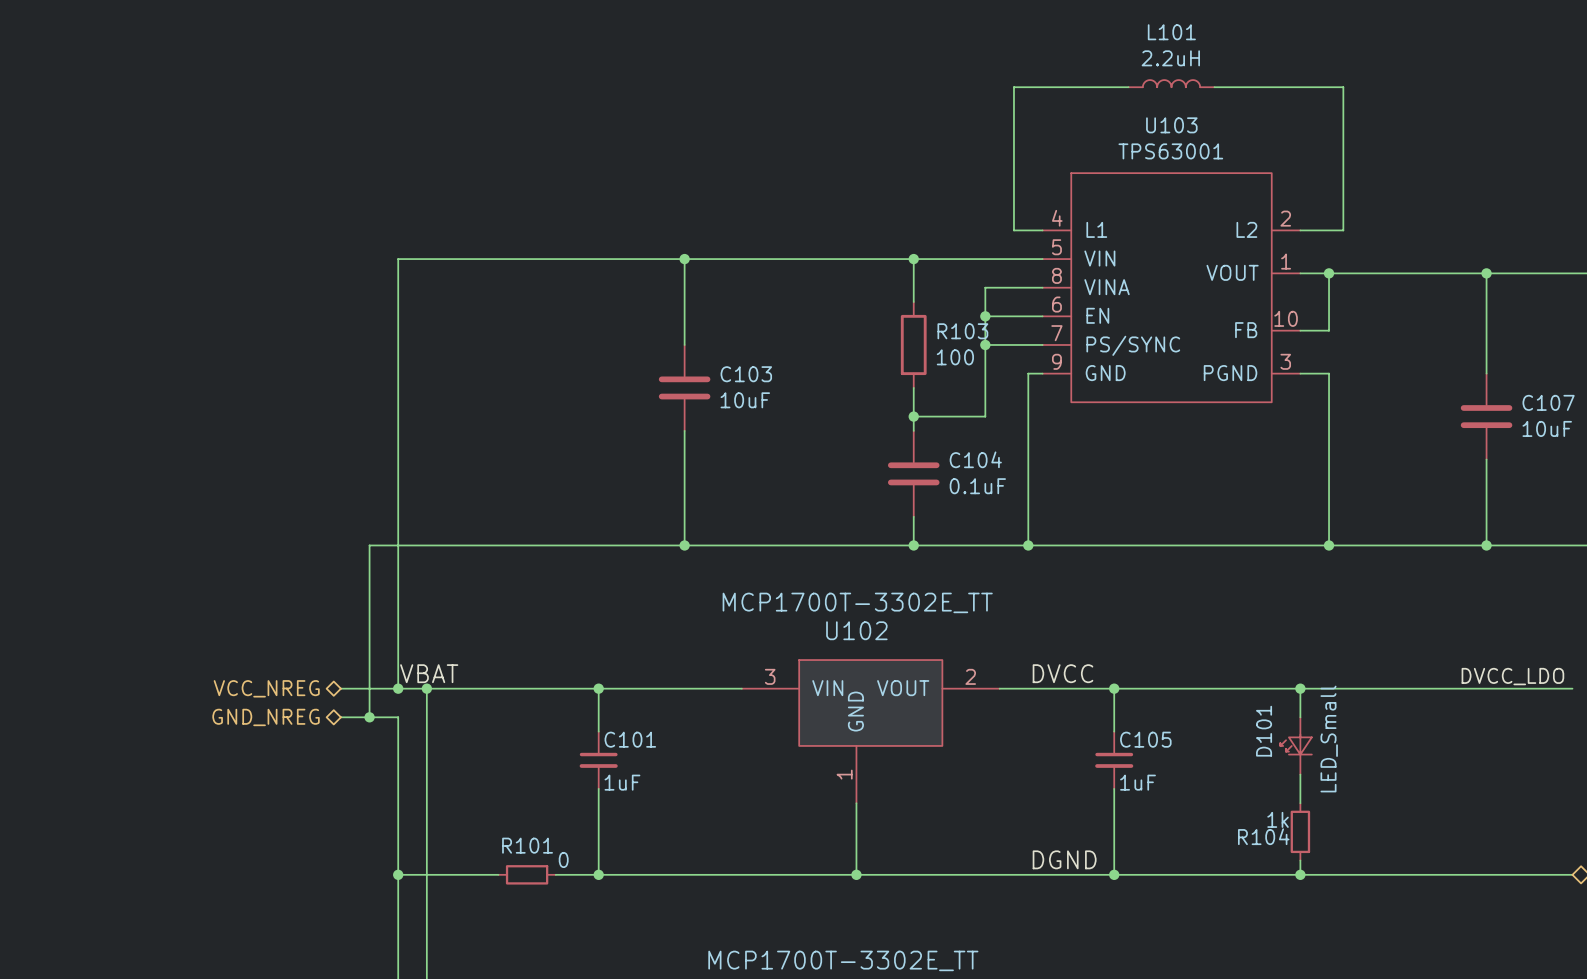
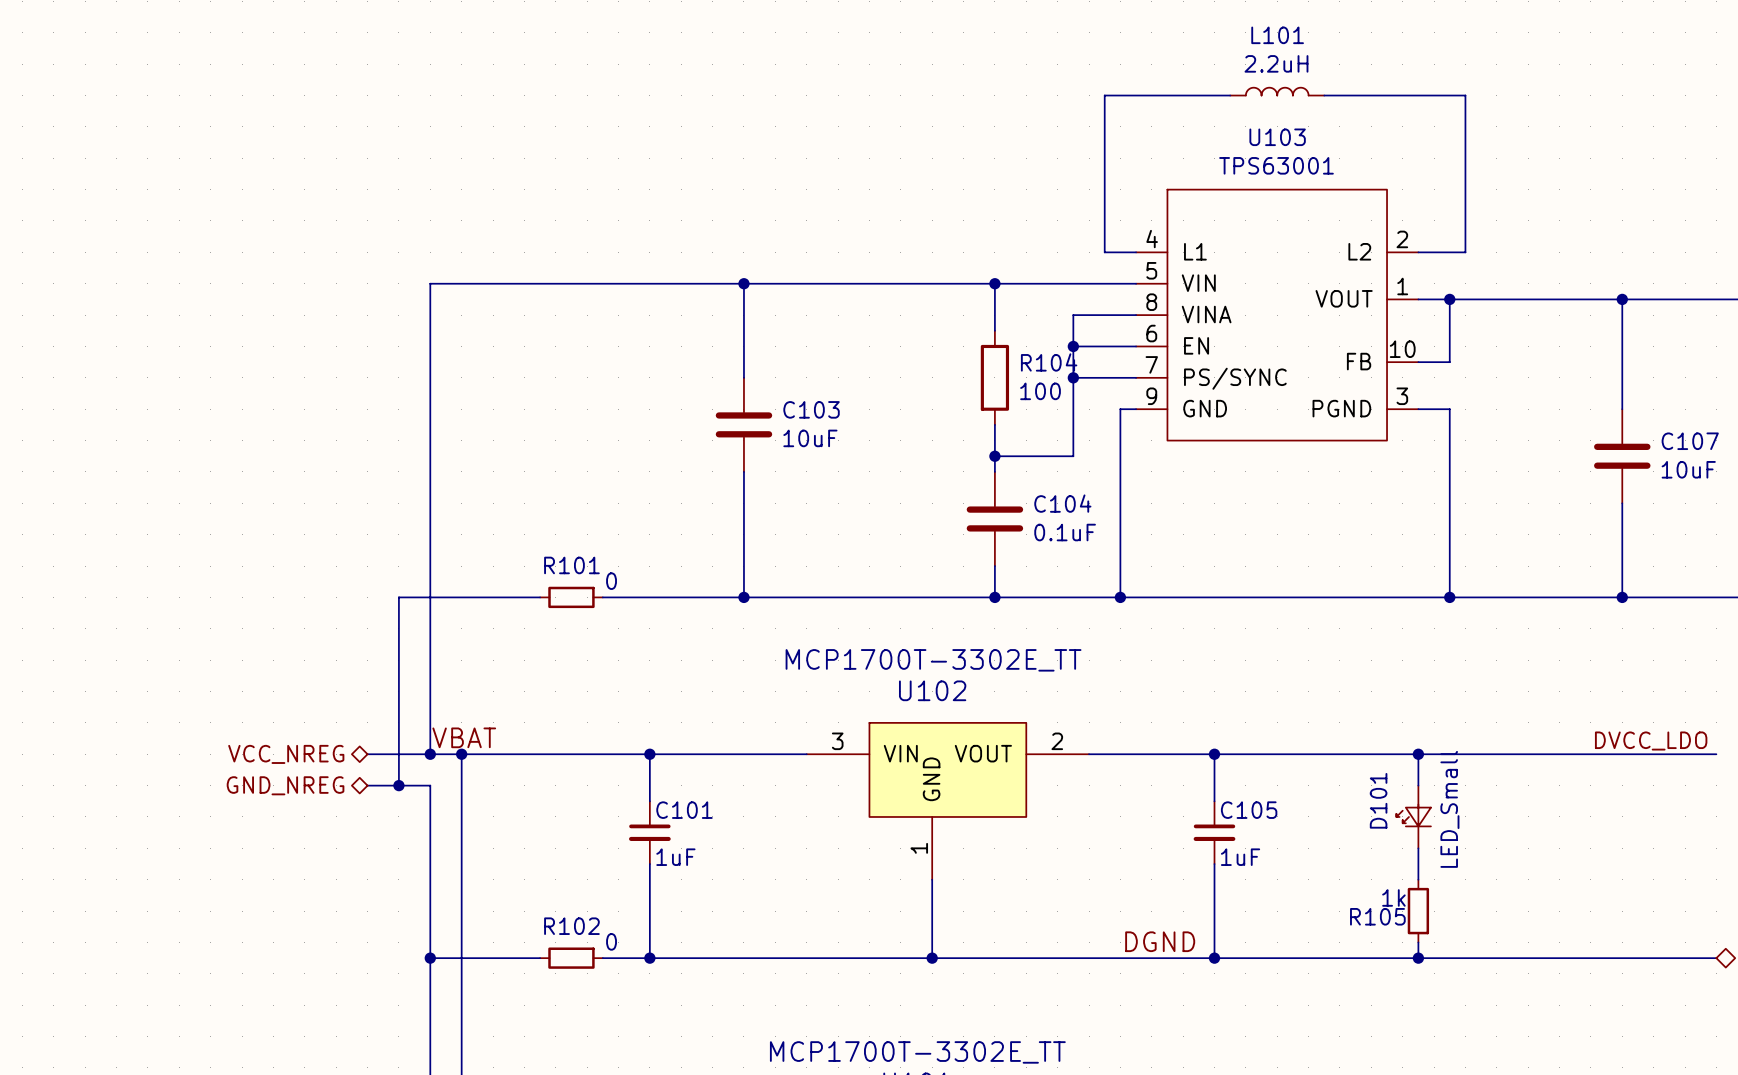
R103 name: R103 (962, 331) -> R104 (1049, 362)
wire: (498, 545) (555, 545) -> none
R101: none -> 0 (571, 597)
label: DVCC (1062, 673) -> none
R104 name: R104 (1263, 836) -> R105 (1377, 916)
R101 name: R101 (527, 845) -> R102 (571, 926)

